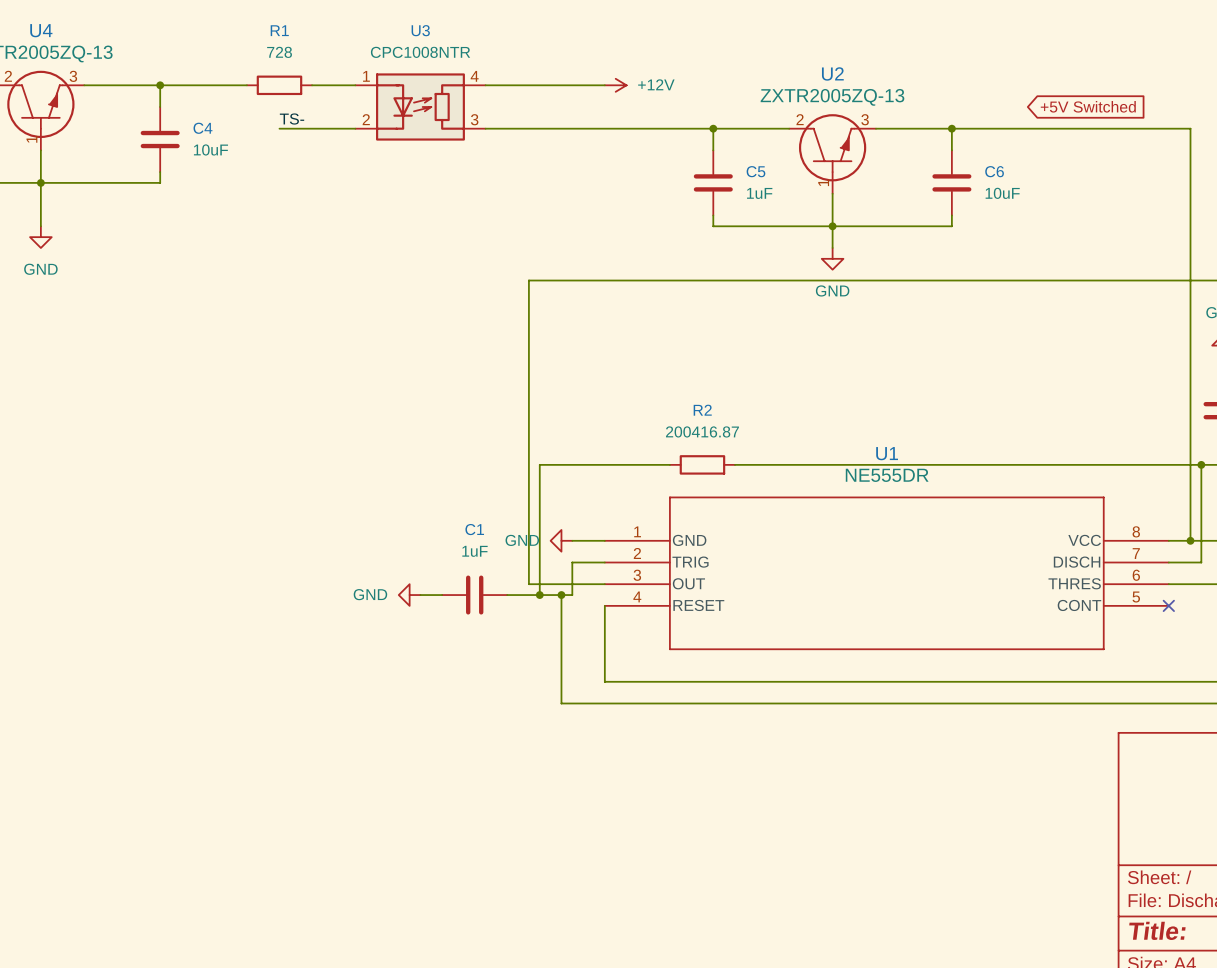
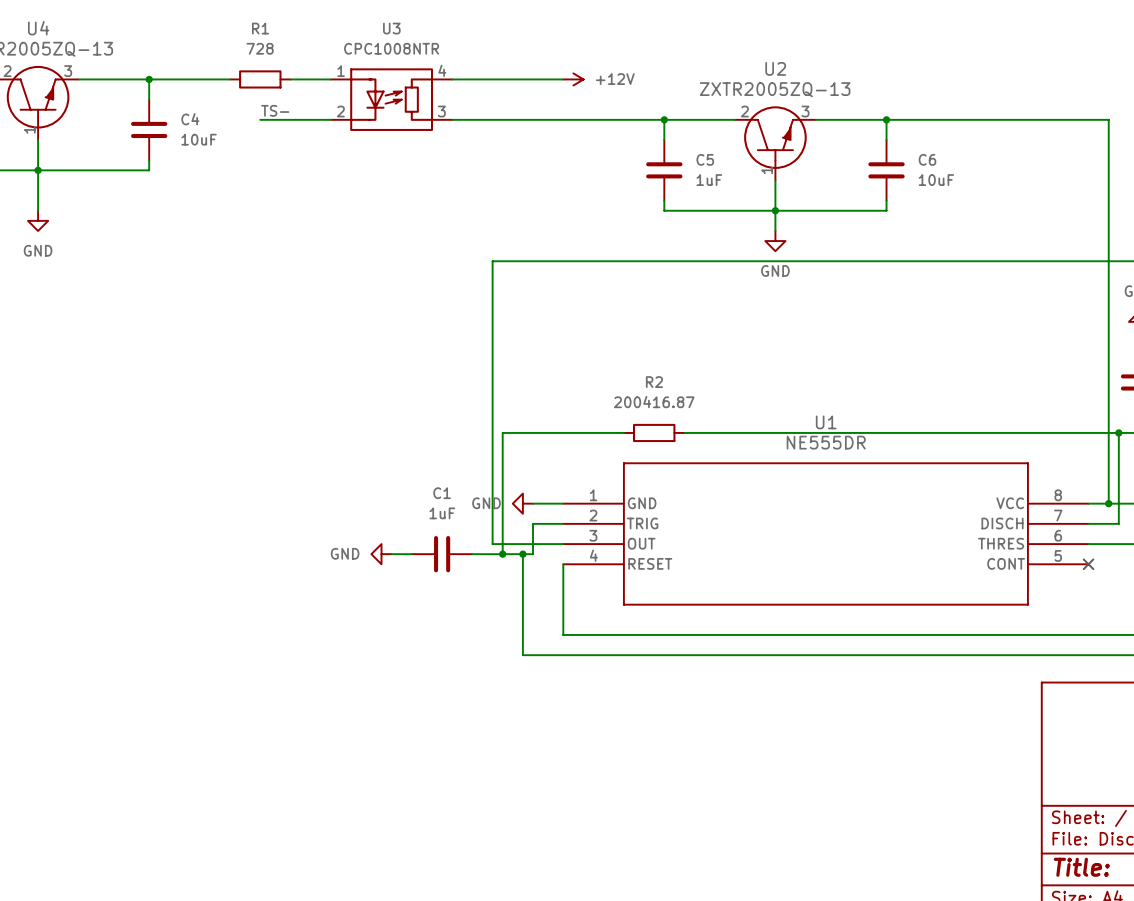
global label: +5V Switched (1088, 106) -> none

